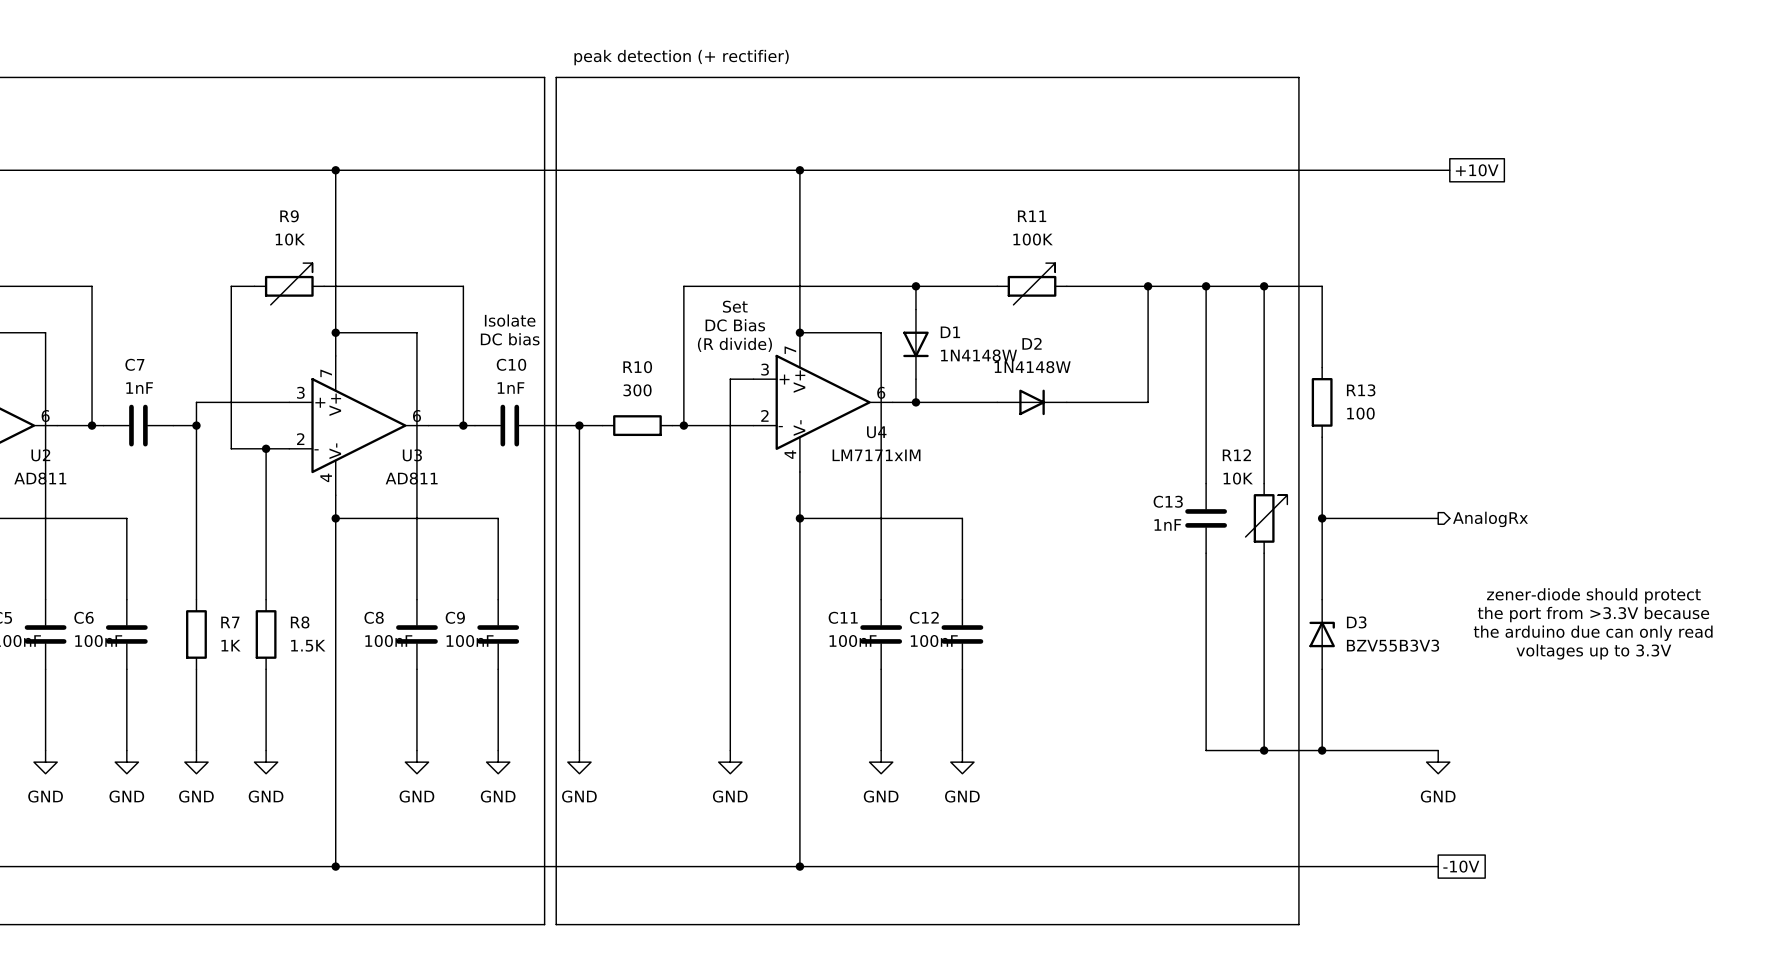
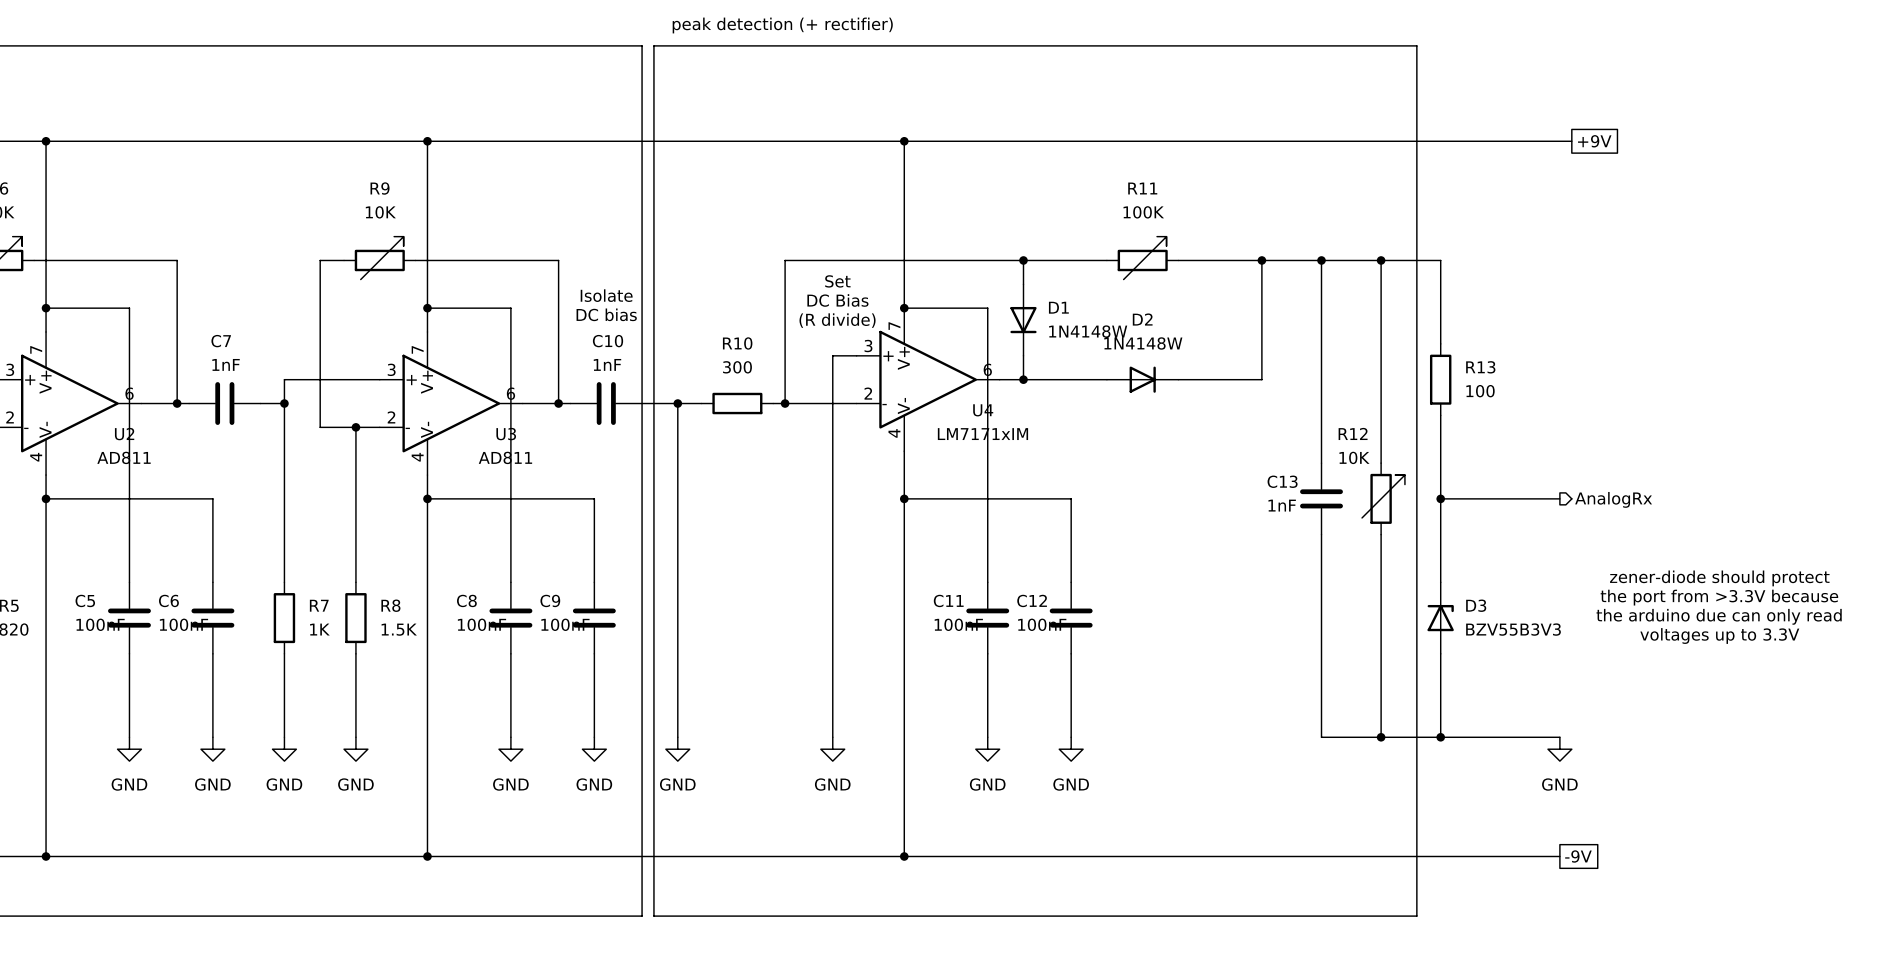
global label: +10V (1477, 170) -> +9V (1594, 141)
global label: -10V (1461, 866) -> -9V (1578, 856)

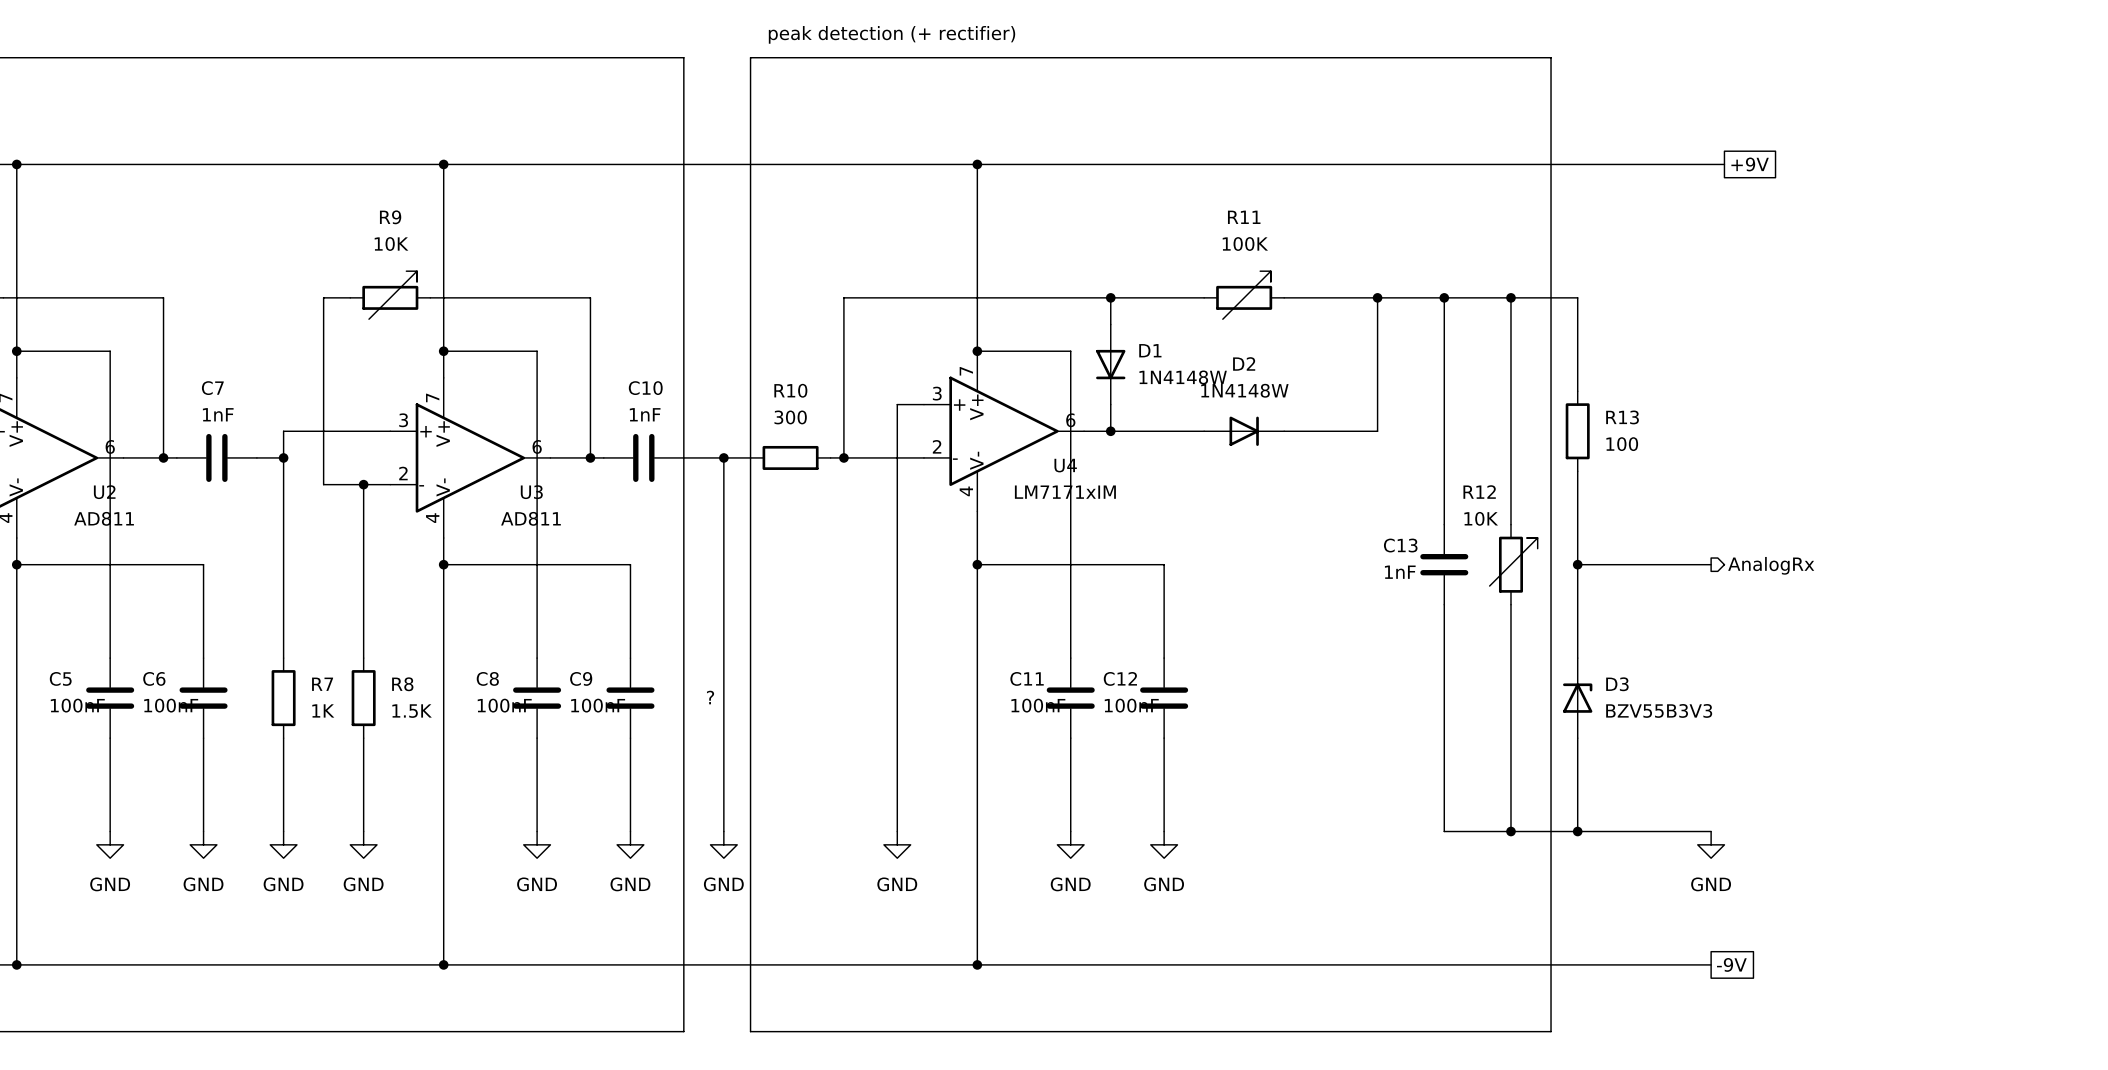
text position: peak detection (+ rectifier) (782, 25) -> peak detection (+ rectifier) (892, 34)
line: (701, 45) (653, 45) (653, 916) (701, 916) -> (750, 57) (750, 1031)
text: Set (837, 281) -> none
text: Isolate (606, 295) -> none
text: DC Bias (837, 300) -> none
text: DC bias (606, 314) -> none
text: (R divide) (837, 320) -> none
text: zener-diode should protect (1719, 578) -> none
text: the port from >3.3V because (1719, 597) -> none
text: the arduino due can only read (1719, 616) -> none
text: none -> ? (710, 697)
text: voltages up to 3.3V (1719, 635) -> none

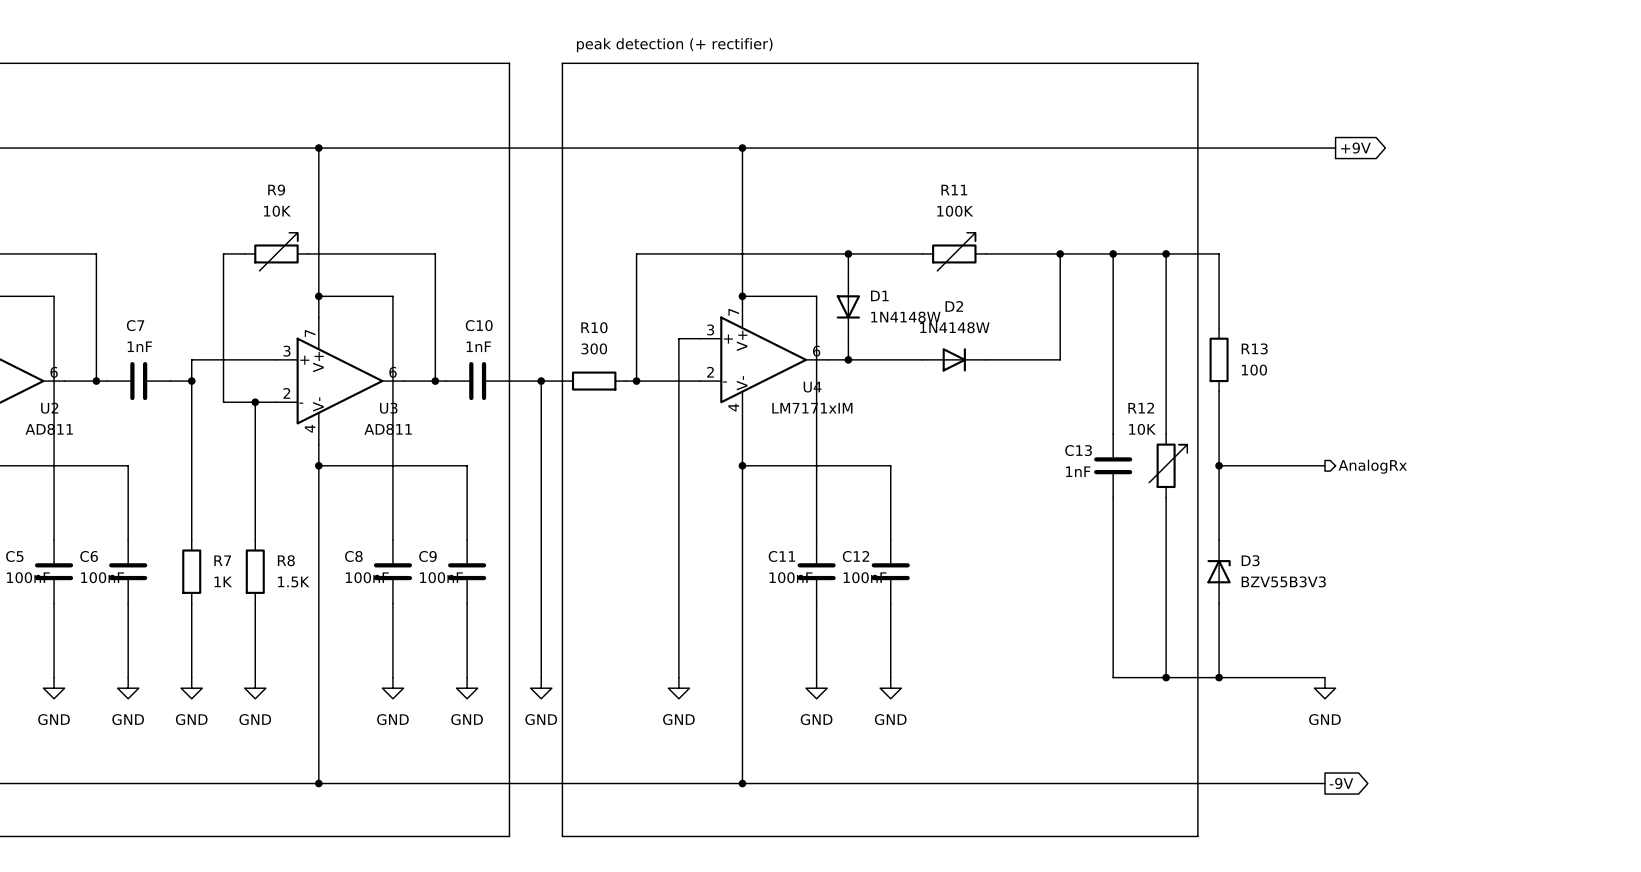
global label shape: passive (1750, 164) -> output (1355, 148)
text: ? (710, 697) -> none
global label shape: passive (1731, 964) -> output (1341, 783)

